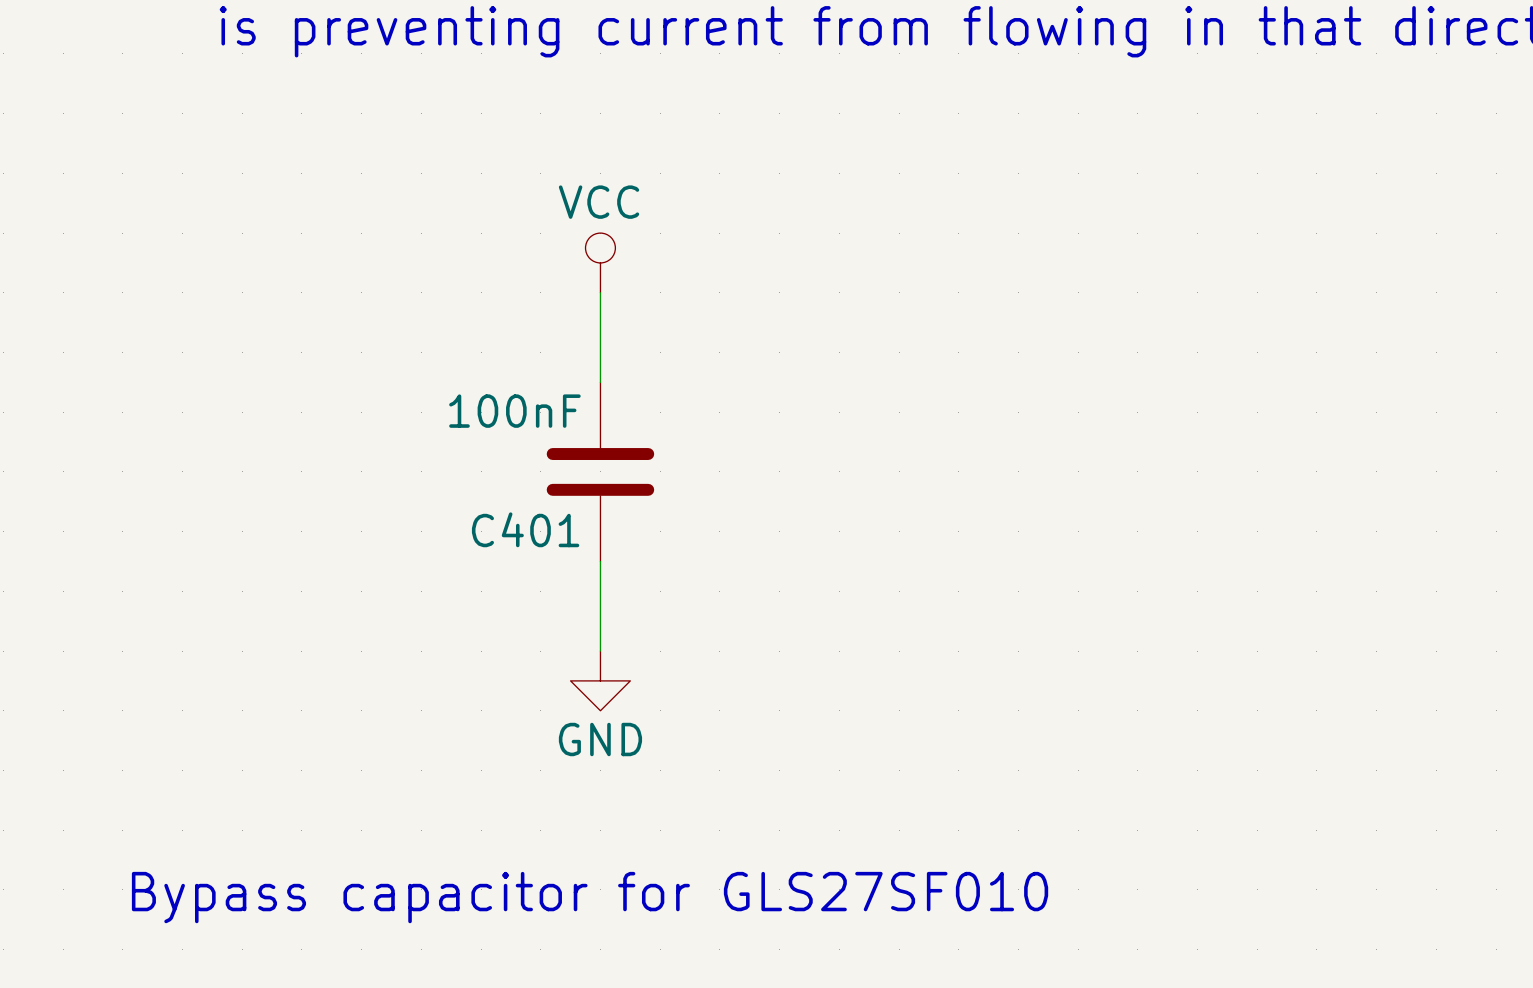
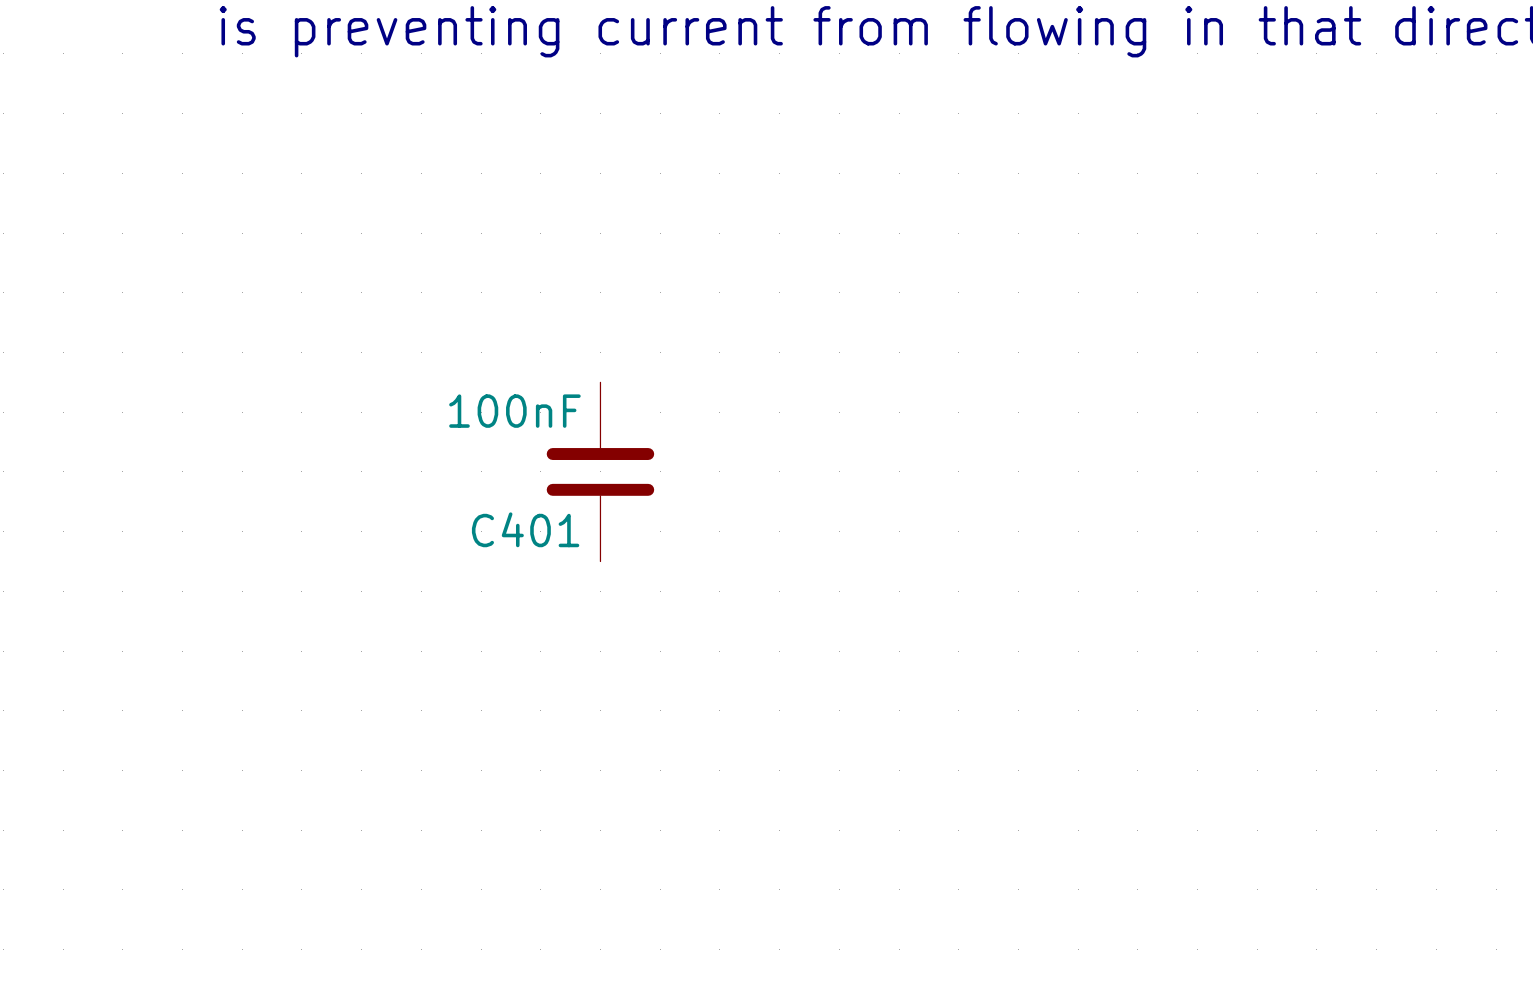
power symbol: VCC (600, 262) -> none
wire: (600, 292) (600, 382) -> none
wire: (600, 561) (600, 651) -> none
power symbol: GND (600, 680) -> none
text: Bypass capacitor for GLS27SF010 (590, 897) -> none

